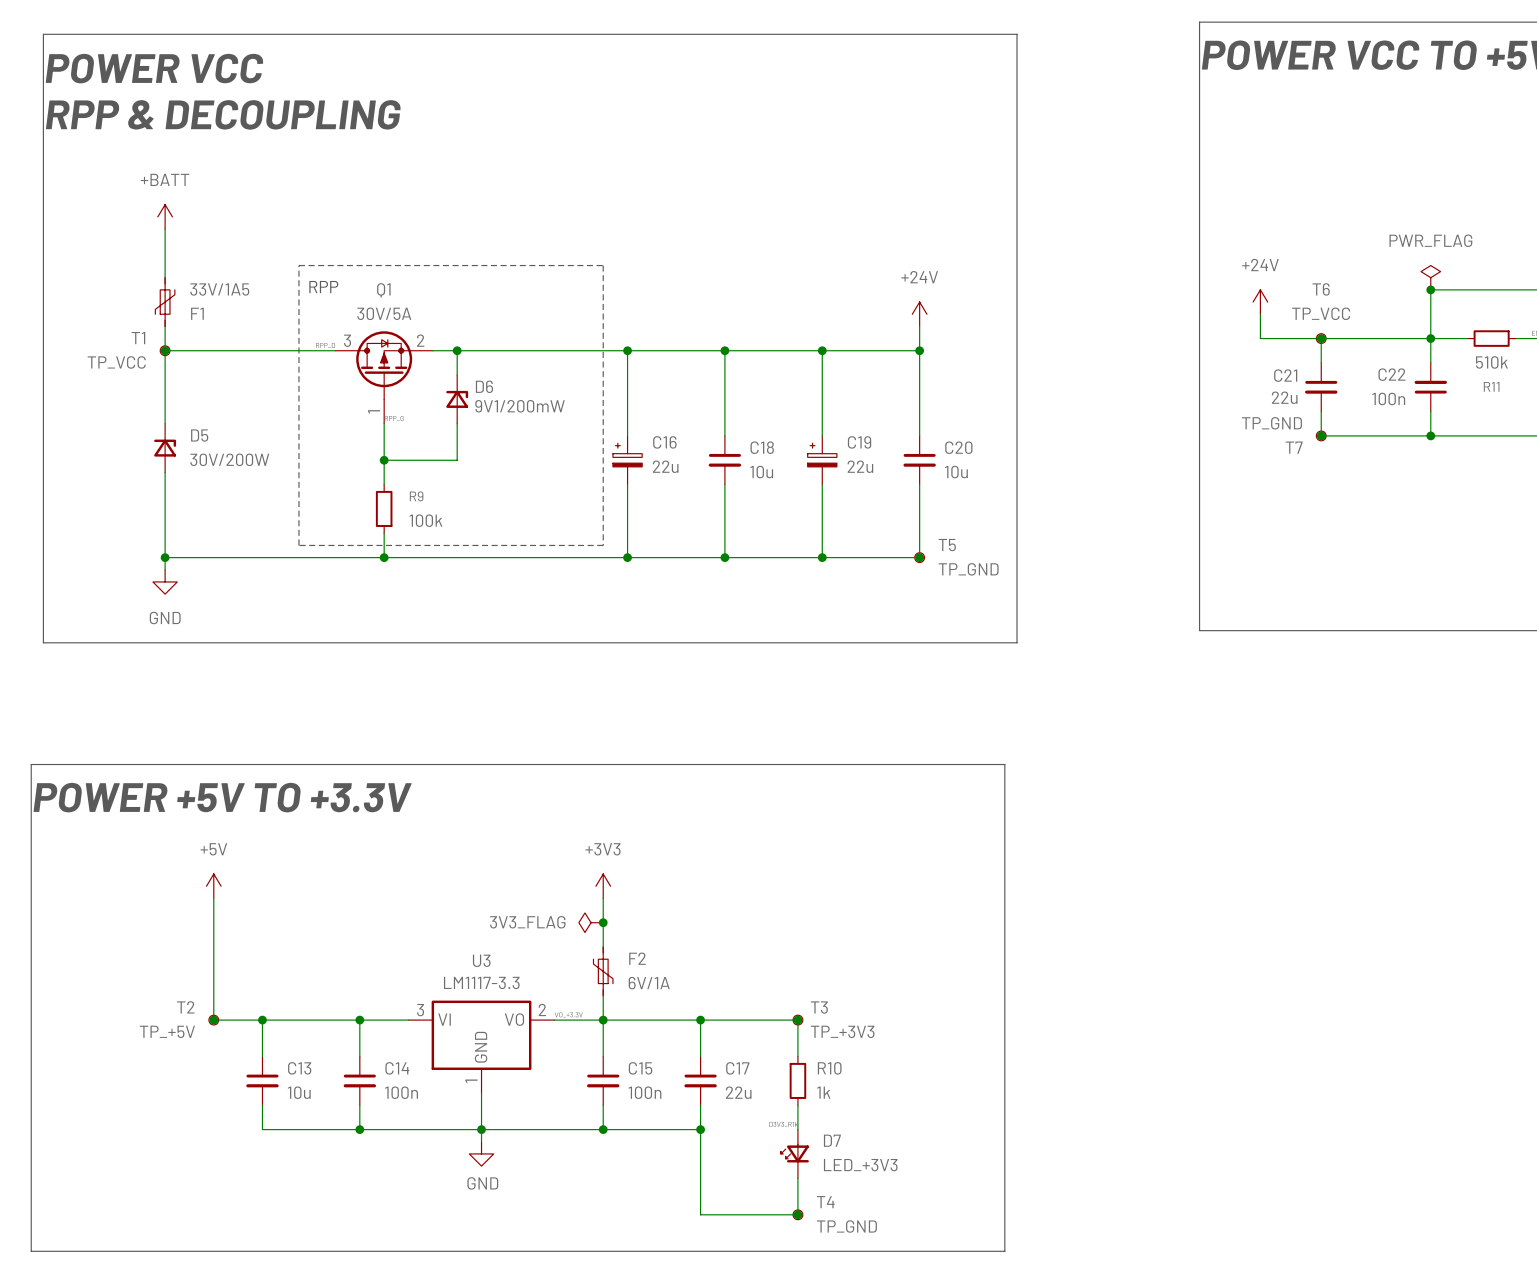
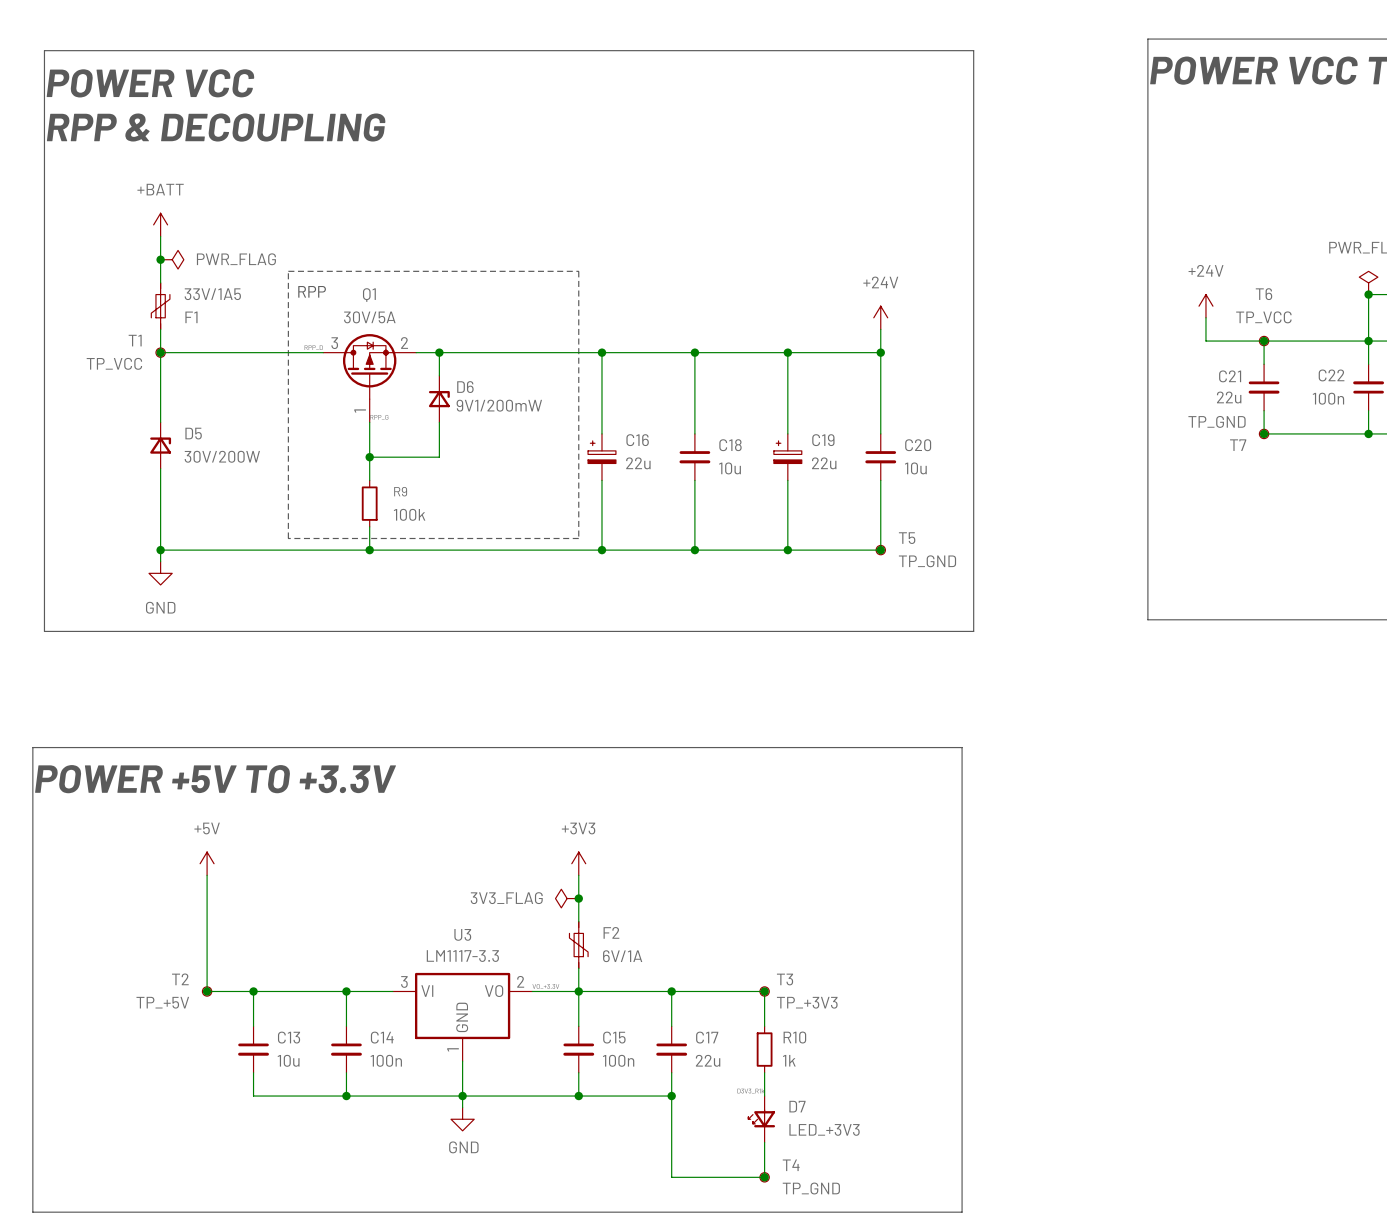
junction: none -> (160, 259)
power symbol: none -> PWR_FLAG (172, 259)

